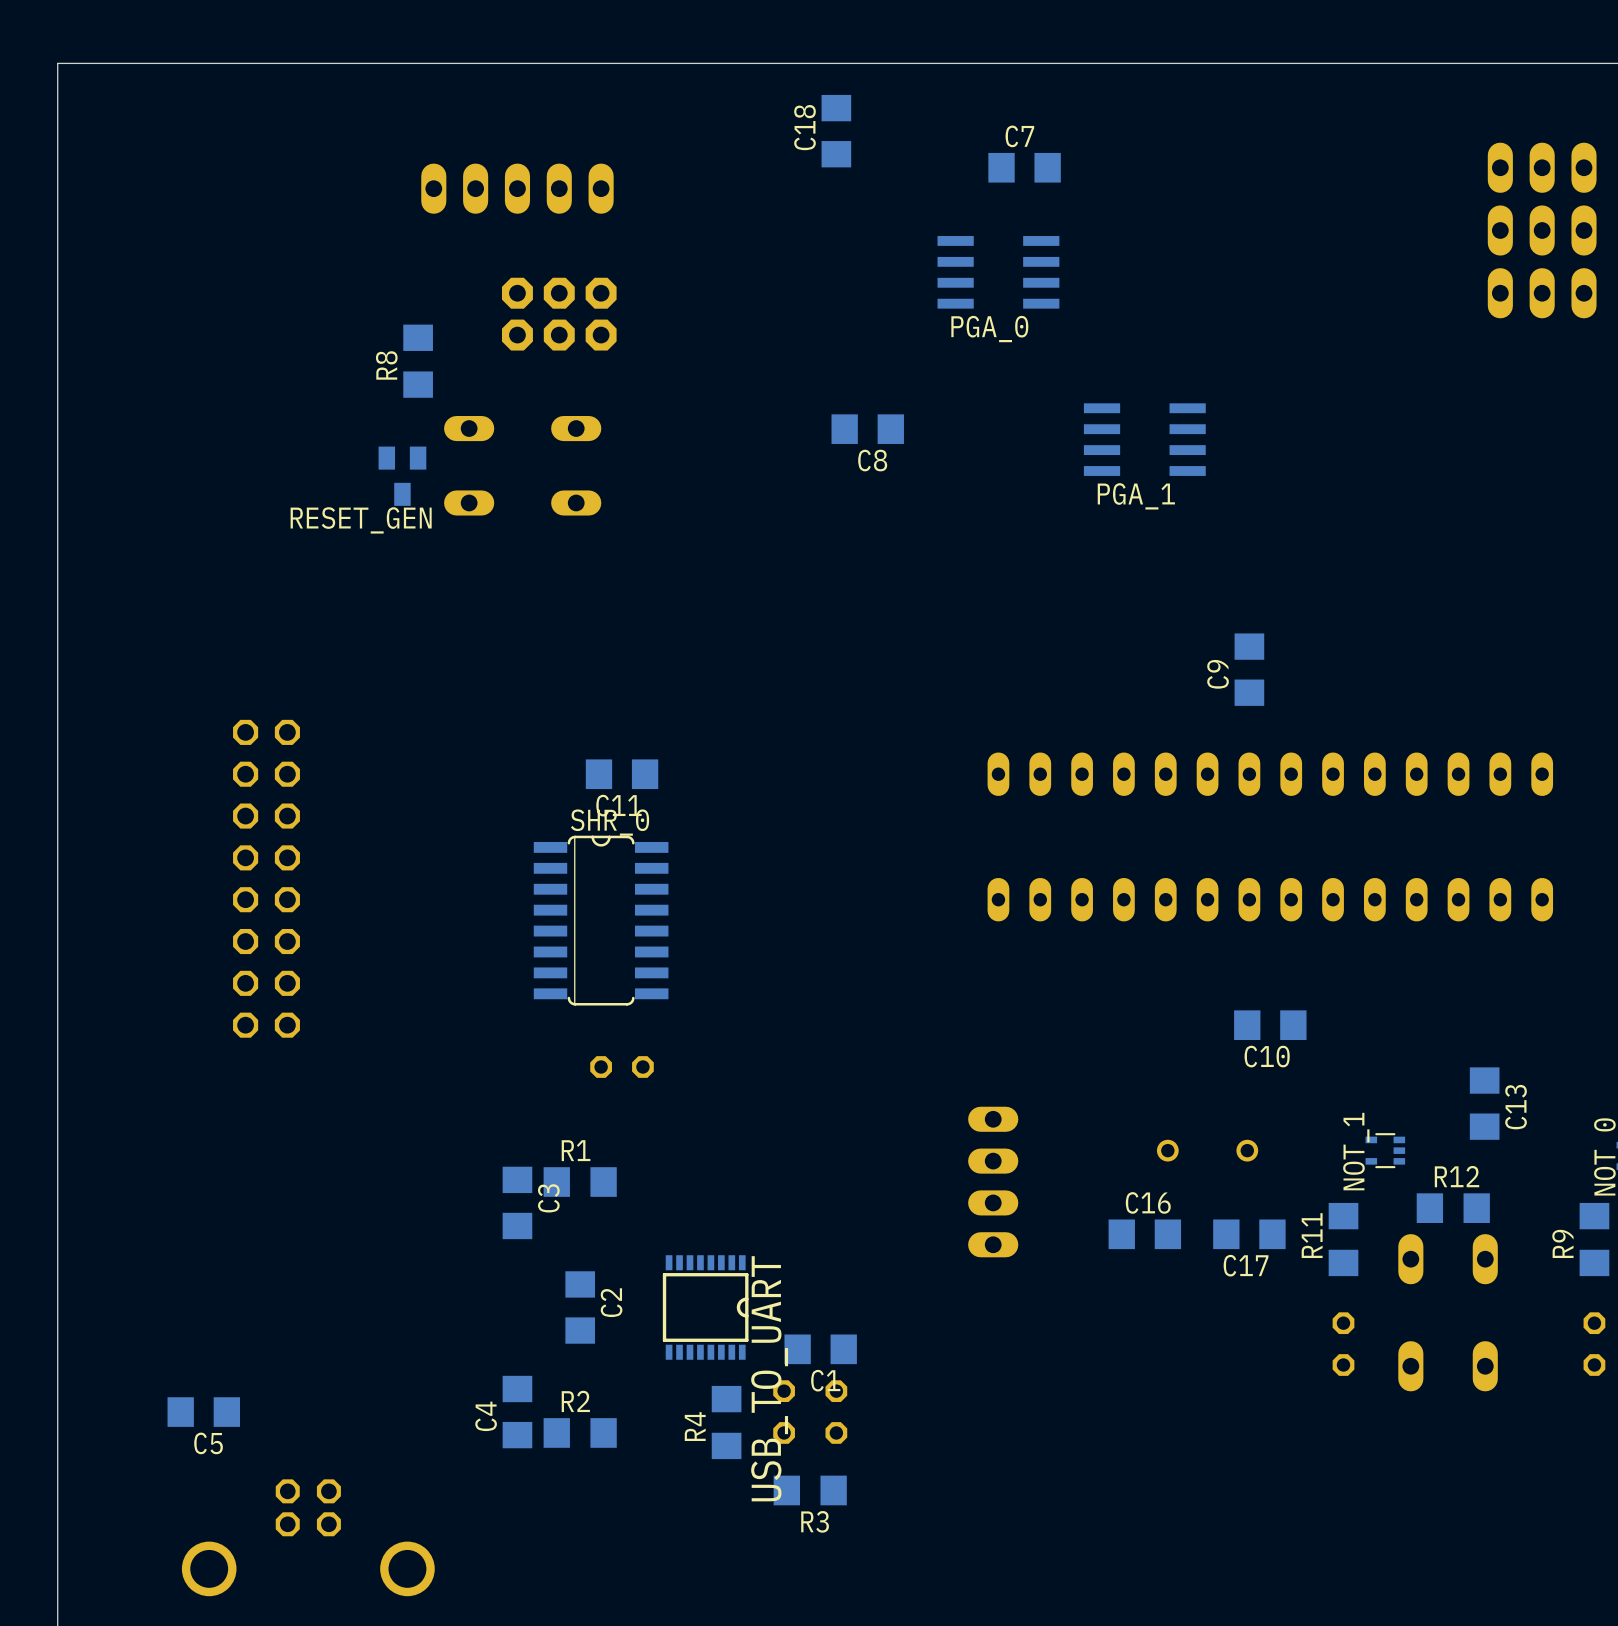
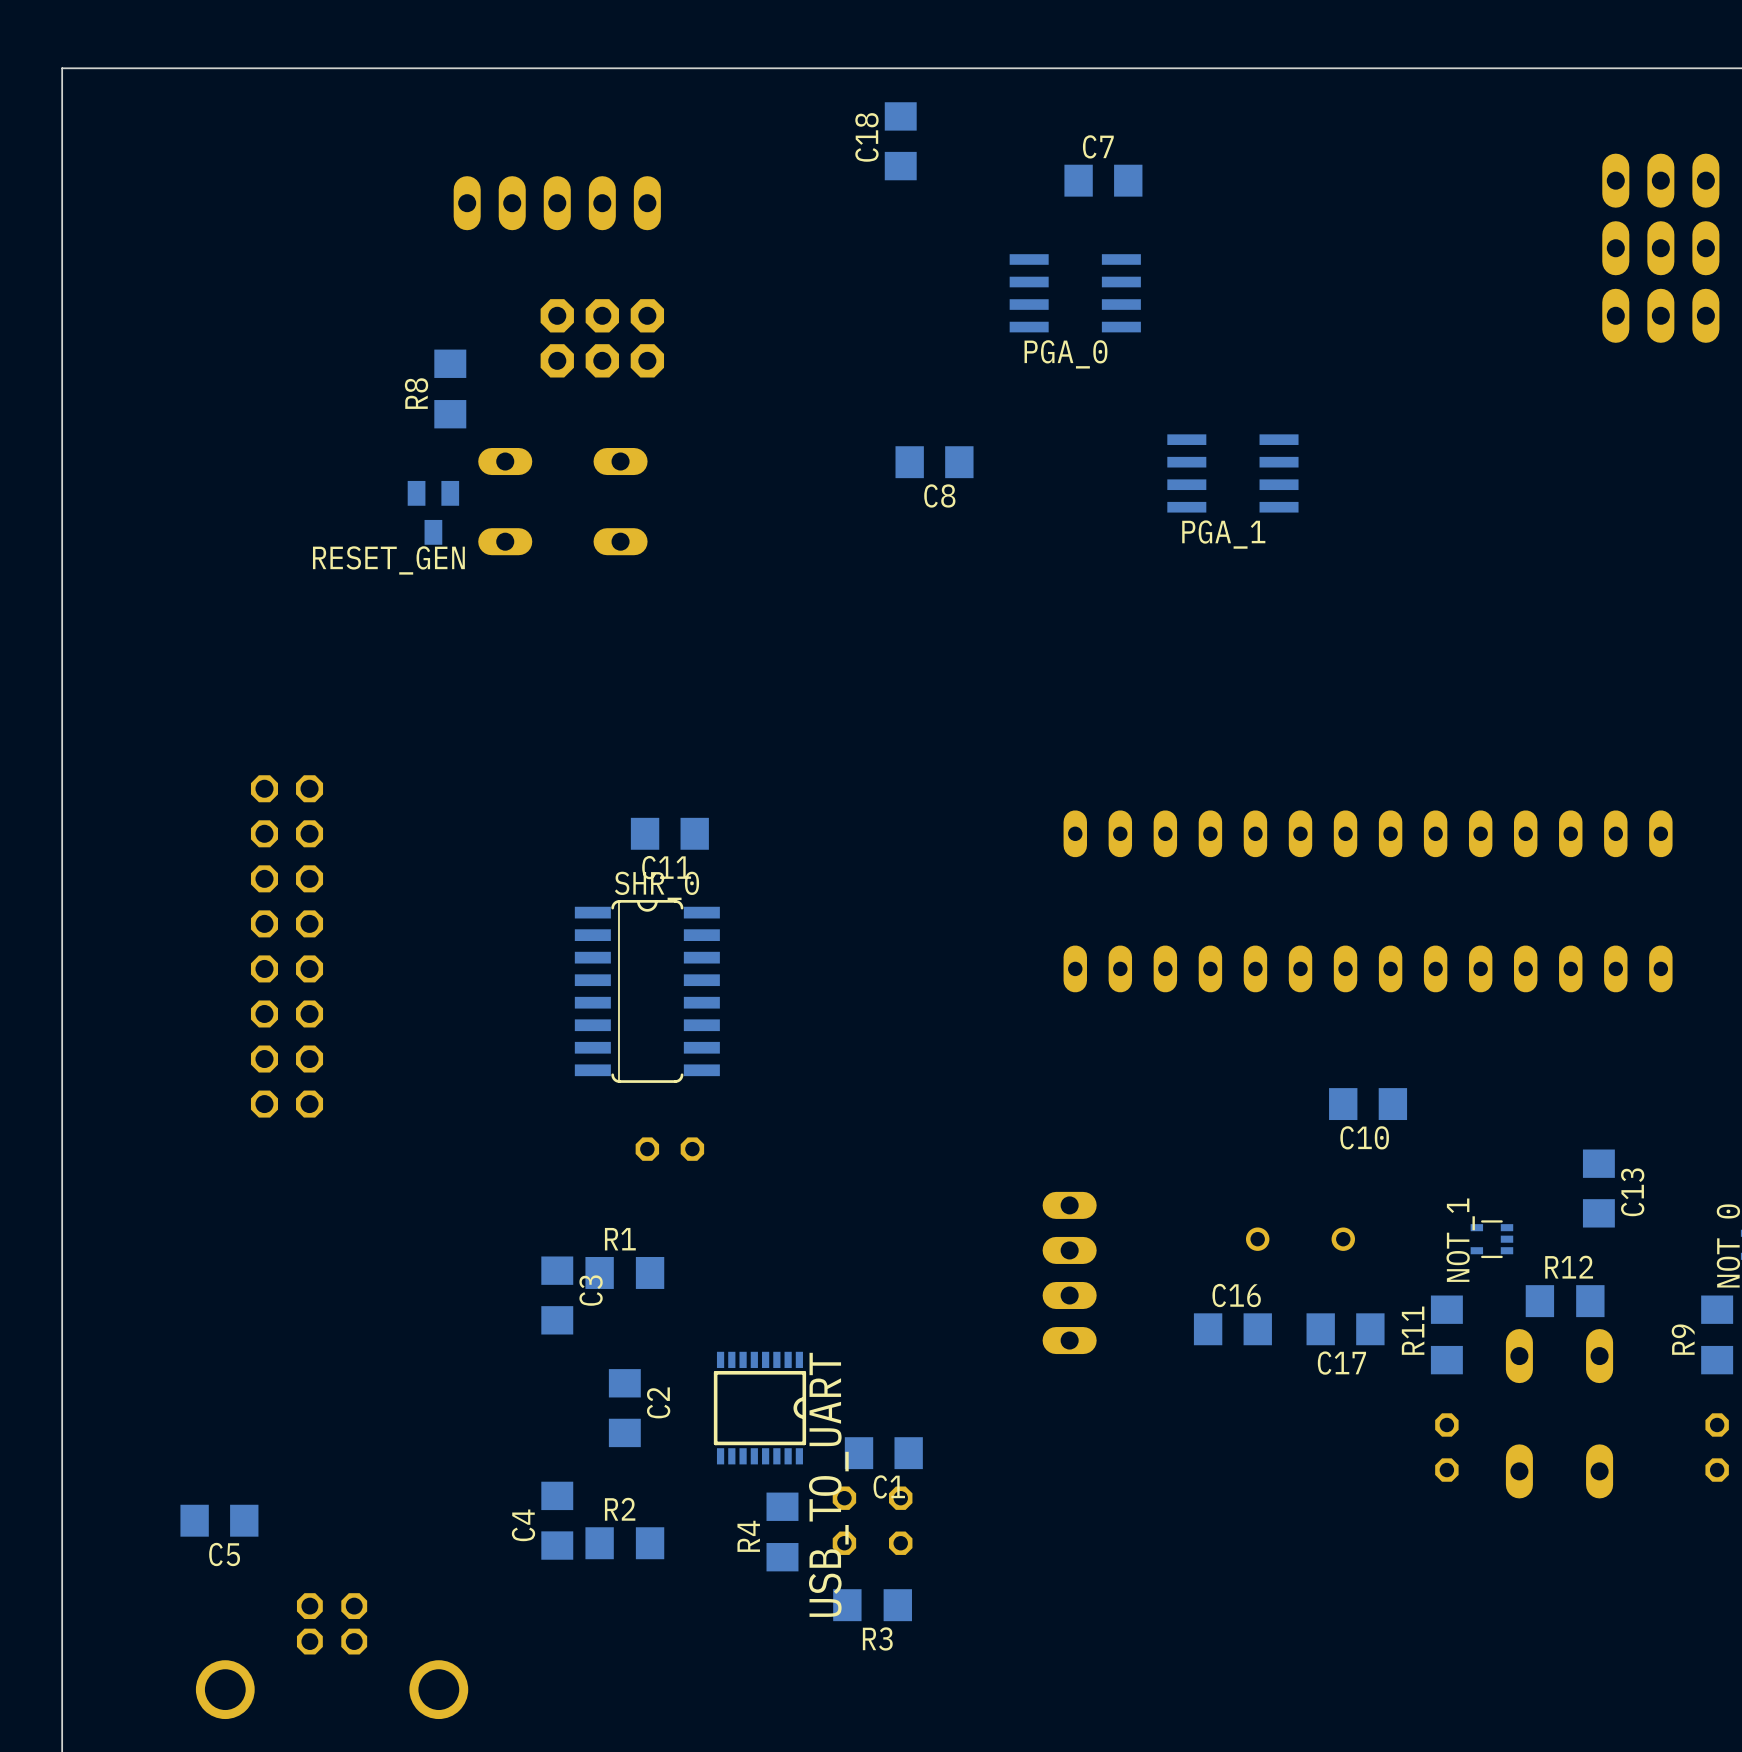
C9: (1249, 669) -> none

